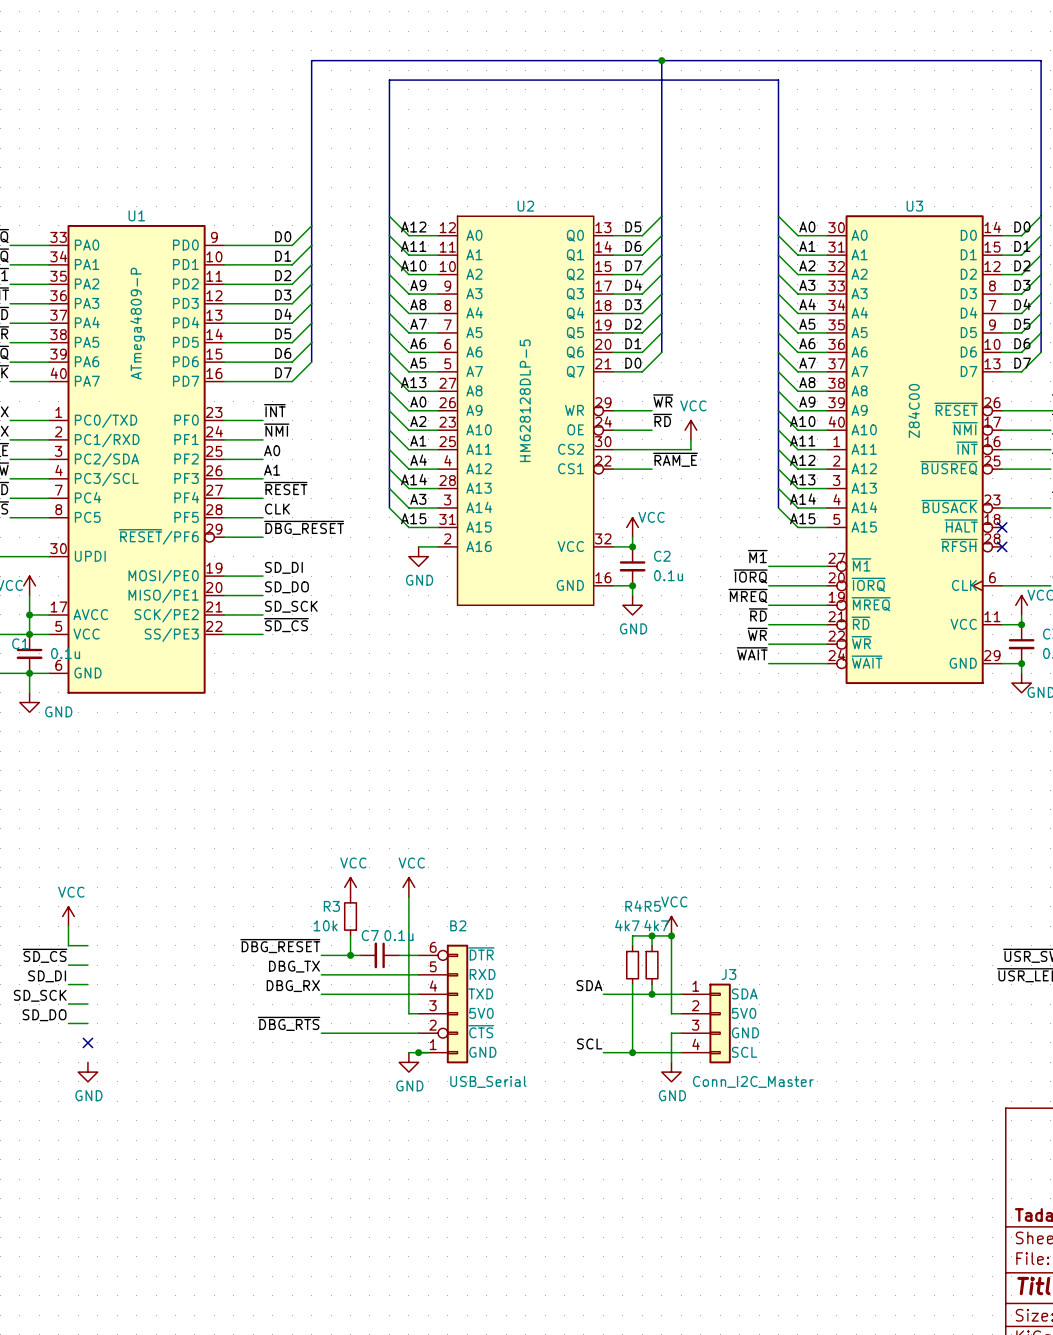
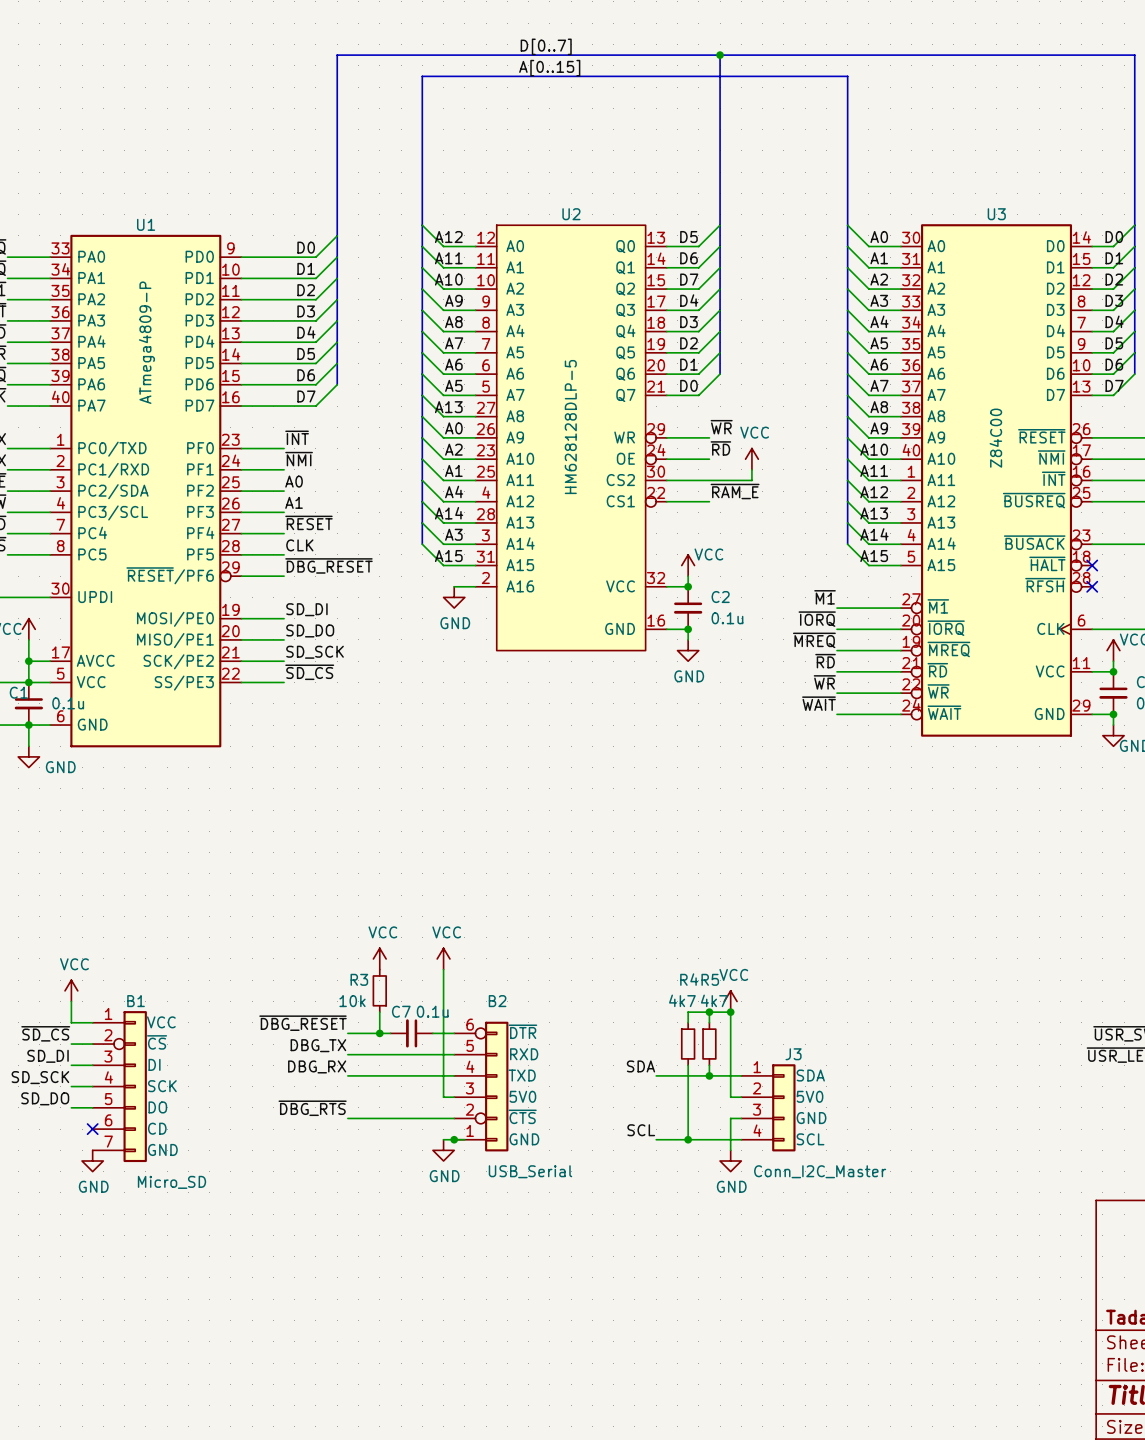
label: none -> D[0..7] (546, 46)
label: none -> A[0..15] (549, 68)
B1: none -> Micro_SD (119, 1086)

